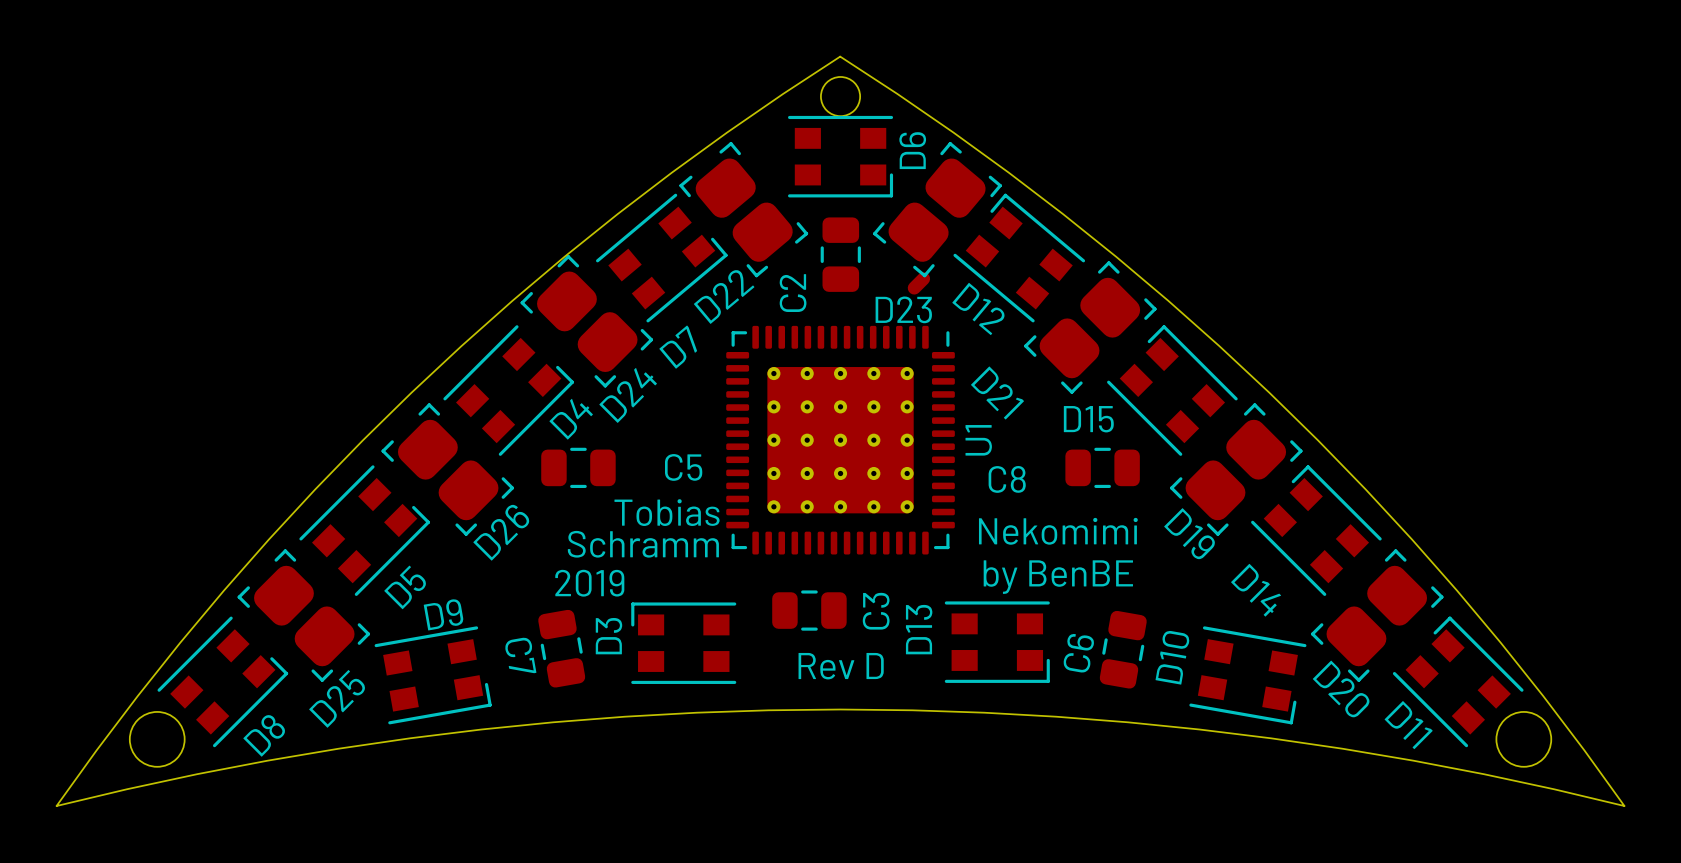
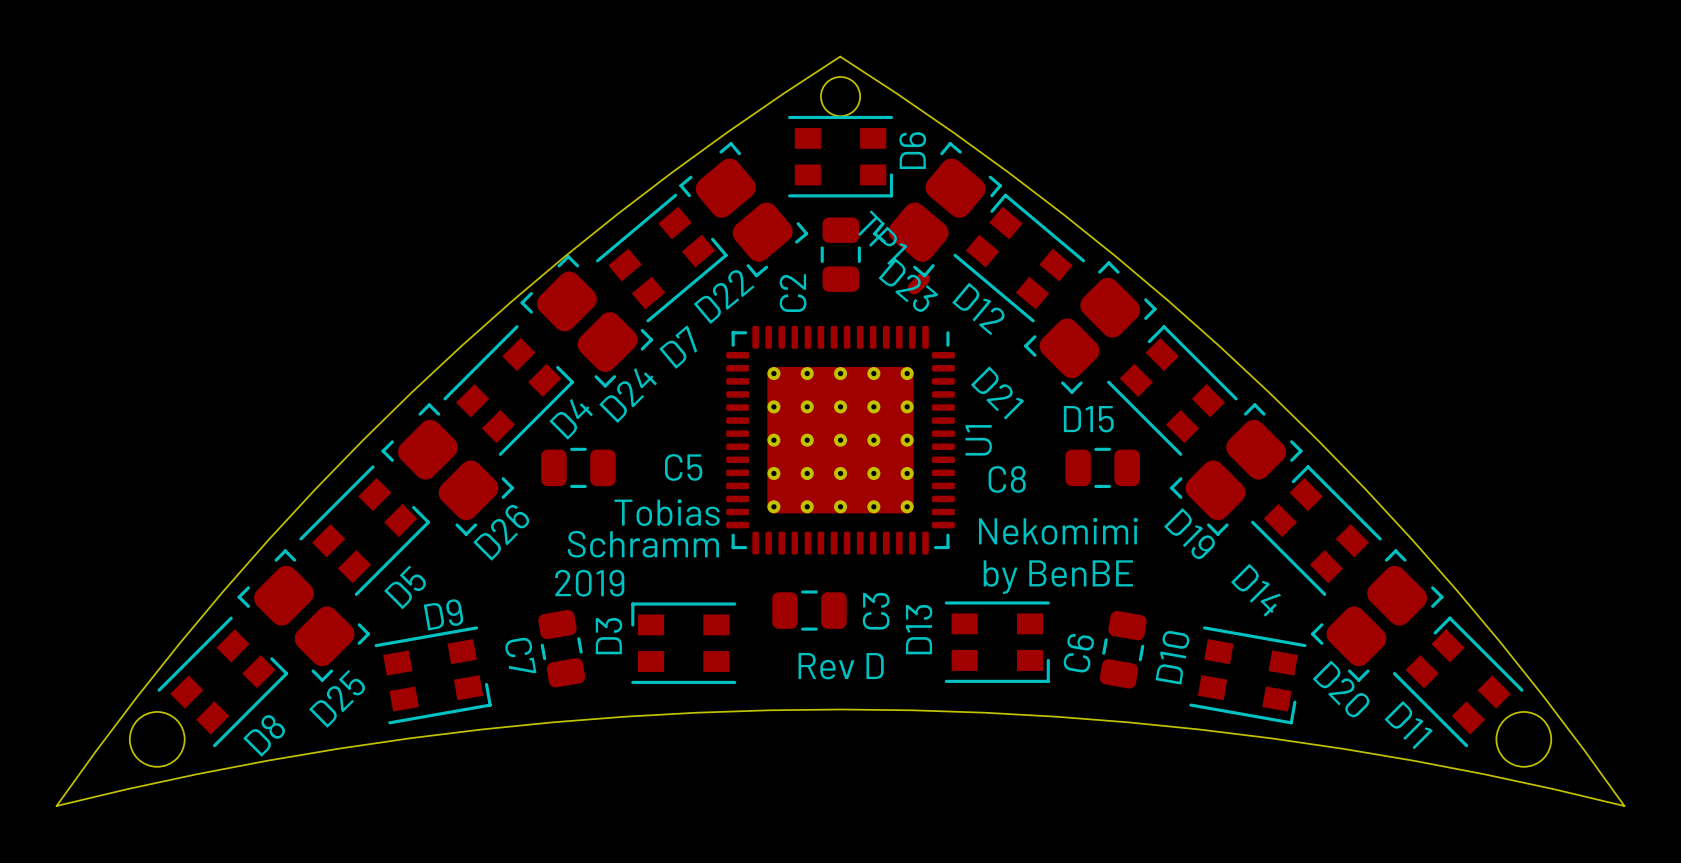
TP1 name: none -> TP1 (882, 237)
D23 name rotation: 0° (903, 309) -> 40° clockwise (908, 285)

